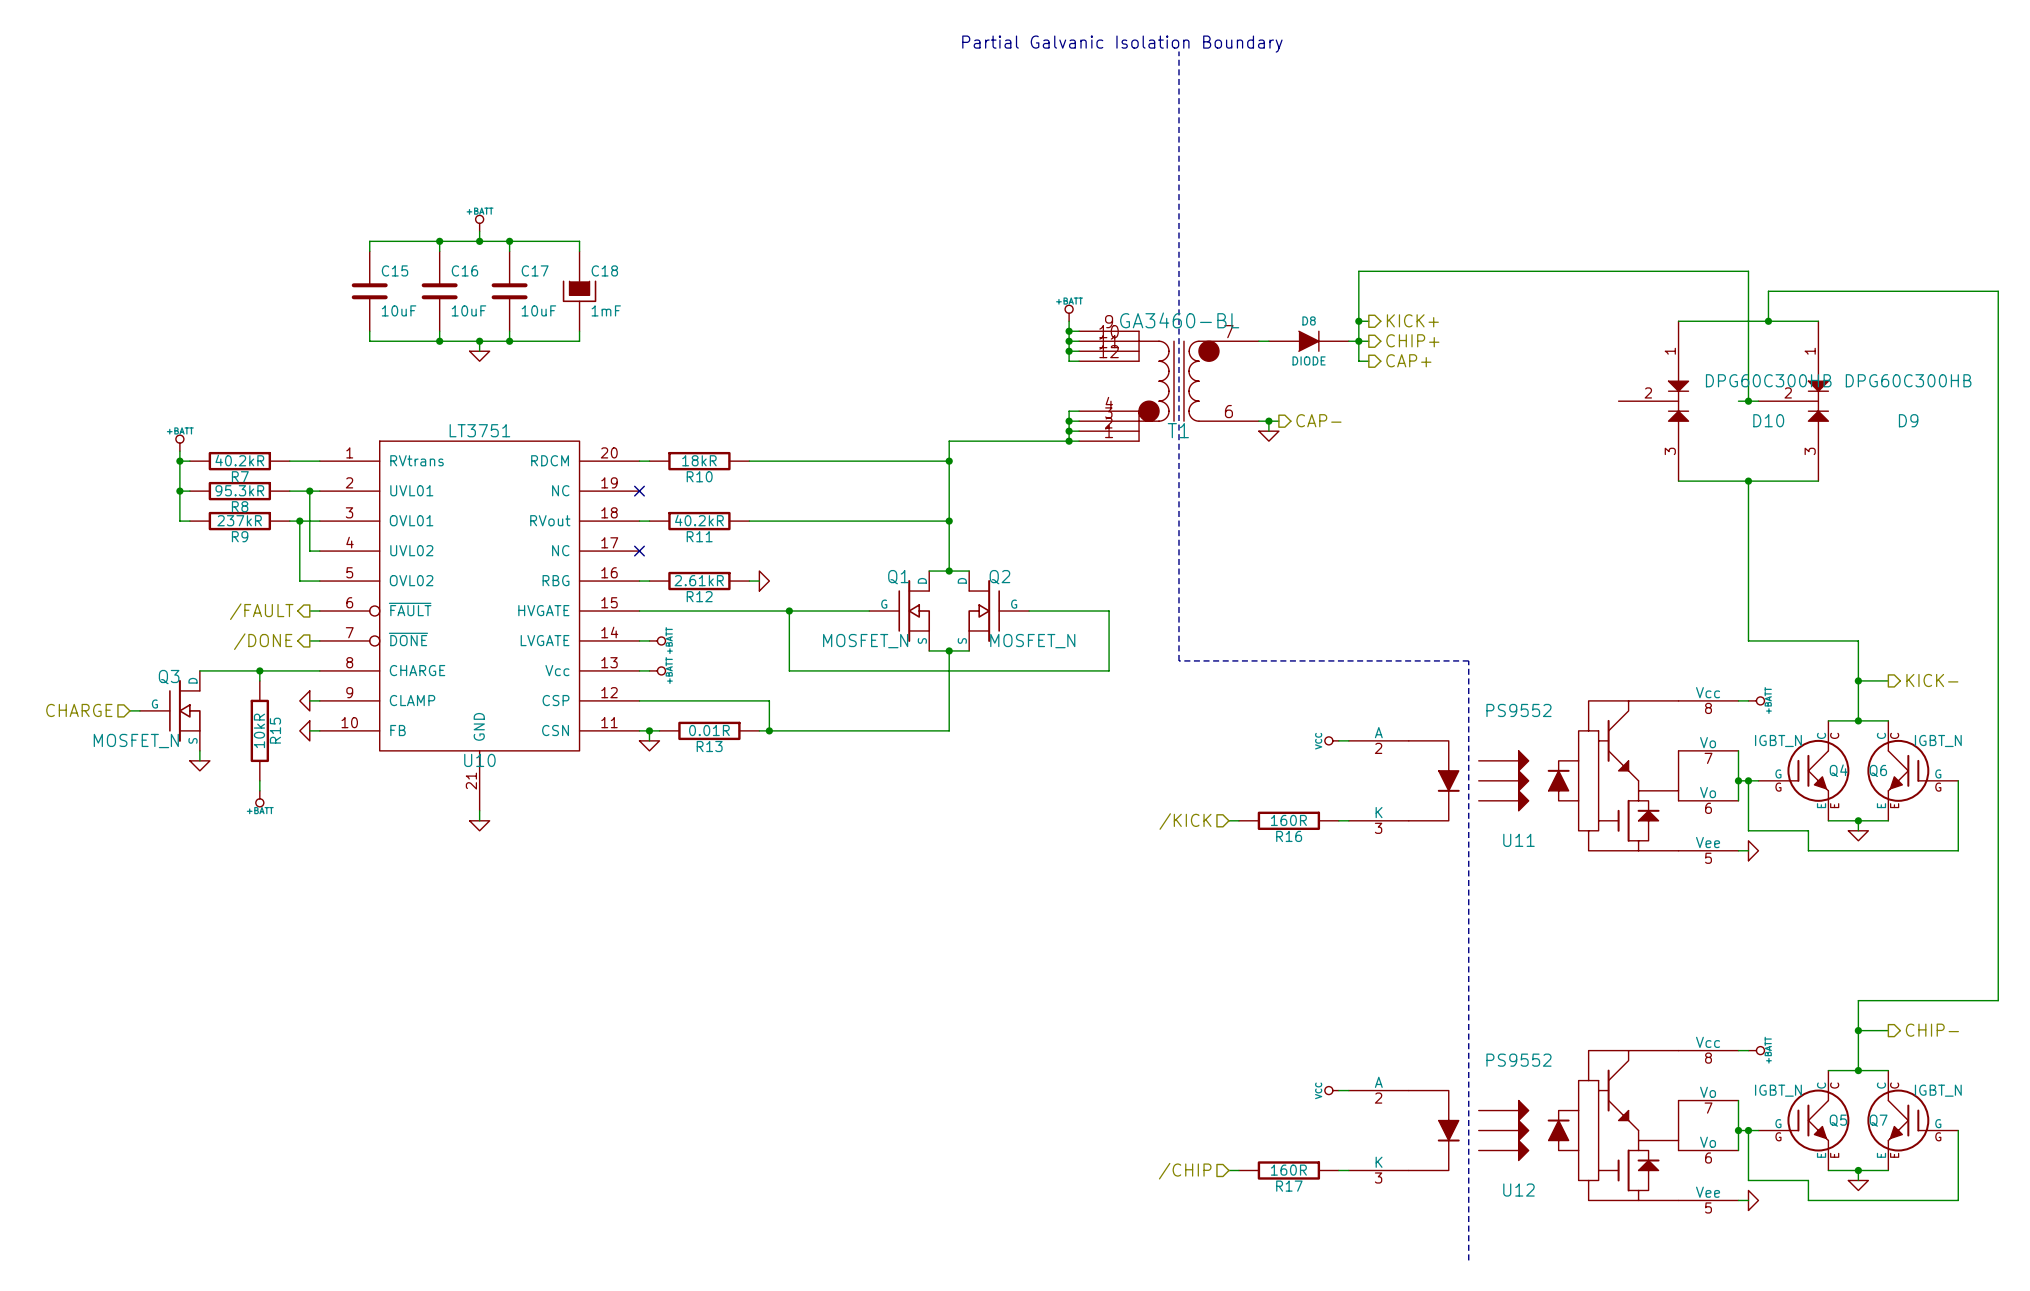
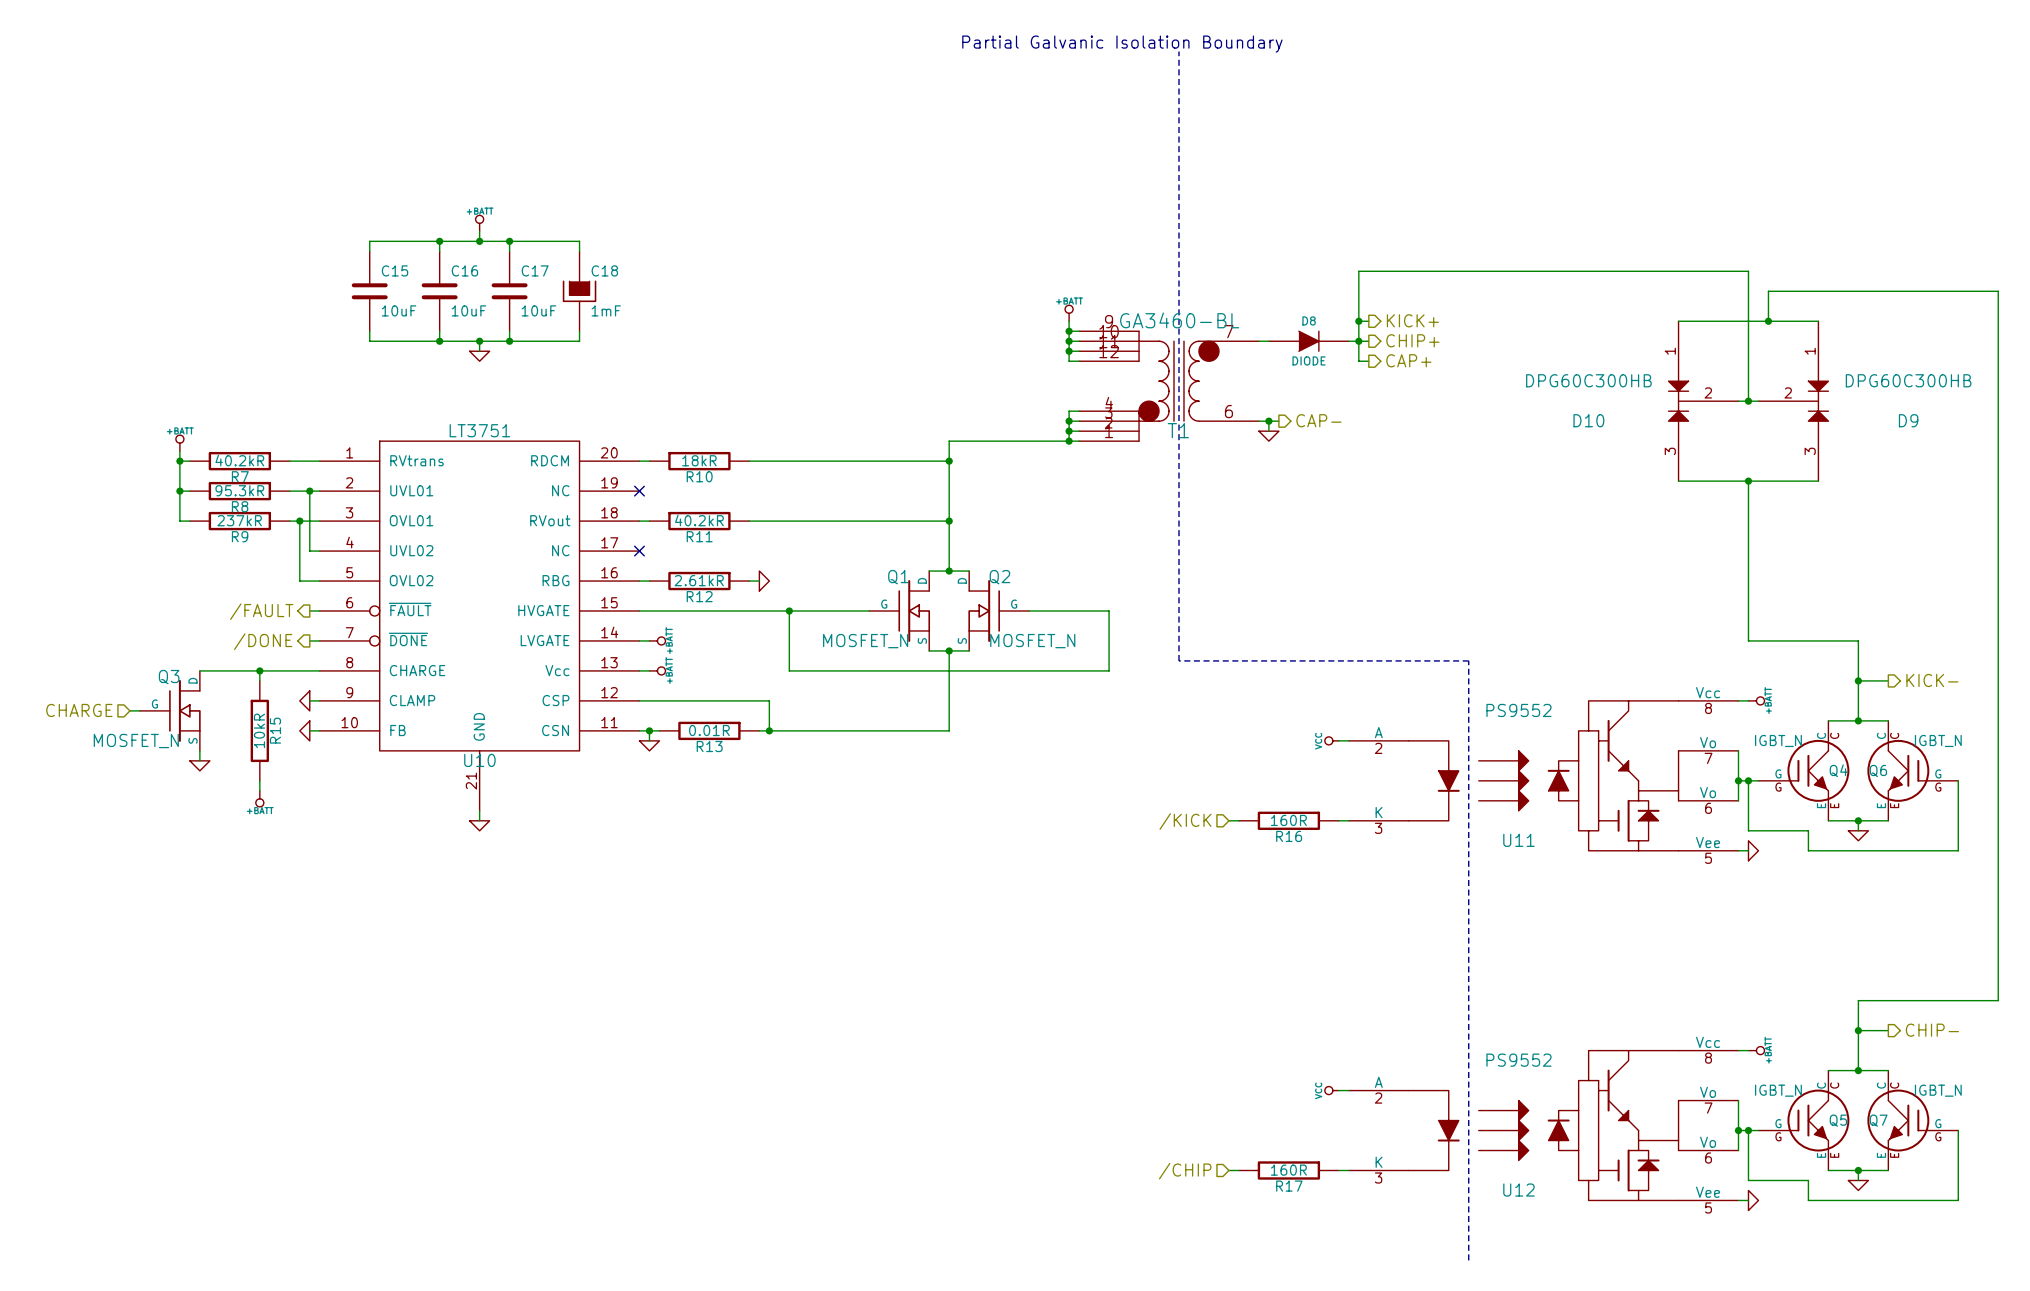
D10 flip: as is (1678, 401) -> left-right (1678, 401)

